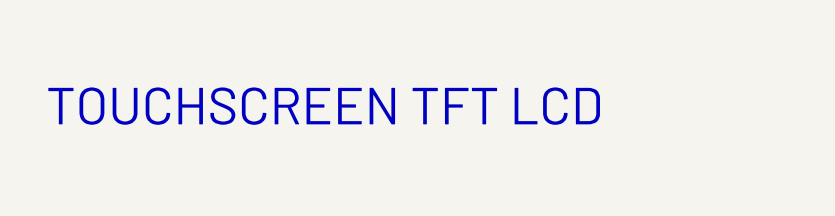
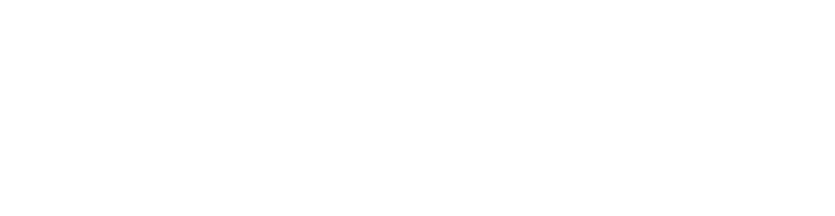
text: TOUCHSCREEN TFT LCD (324, 106) -> none

